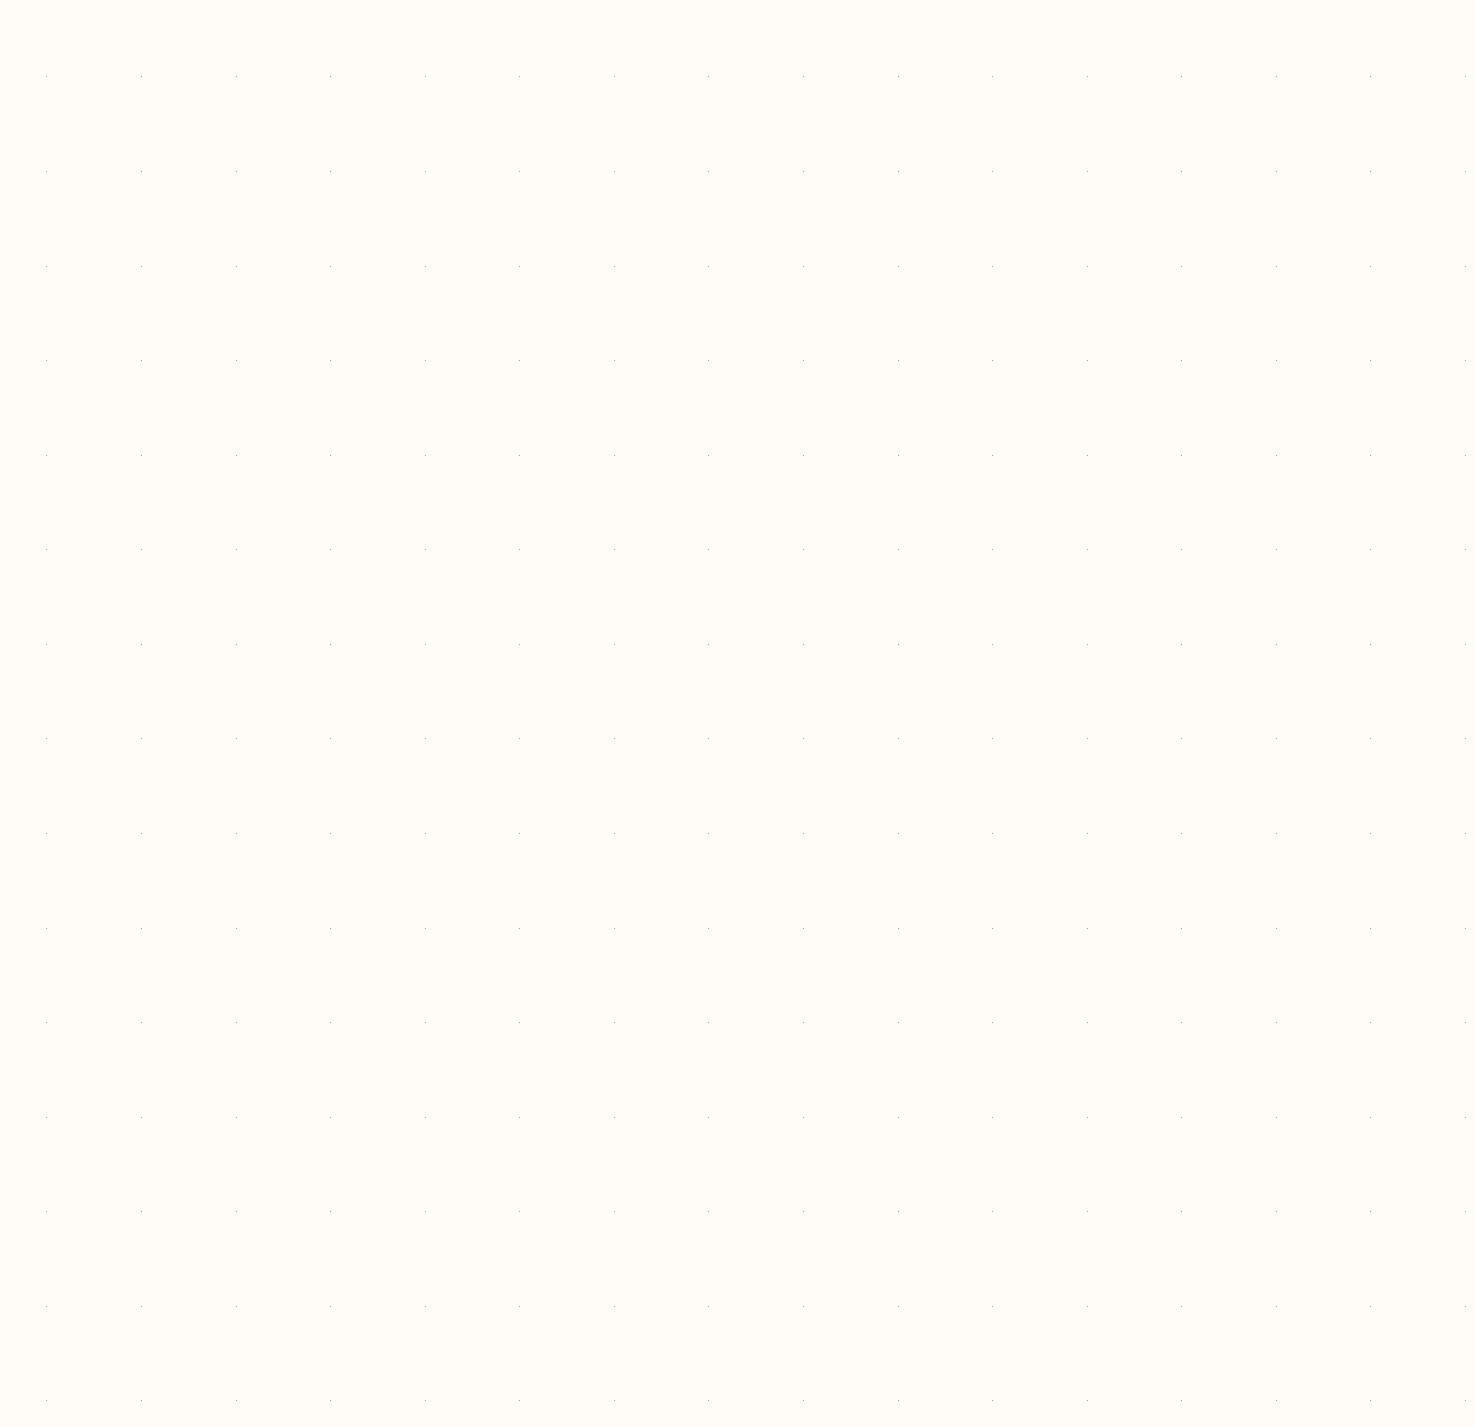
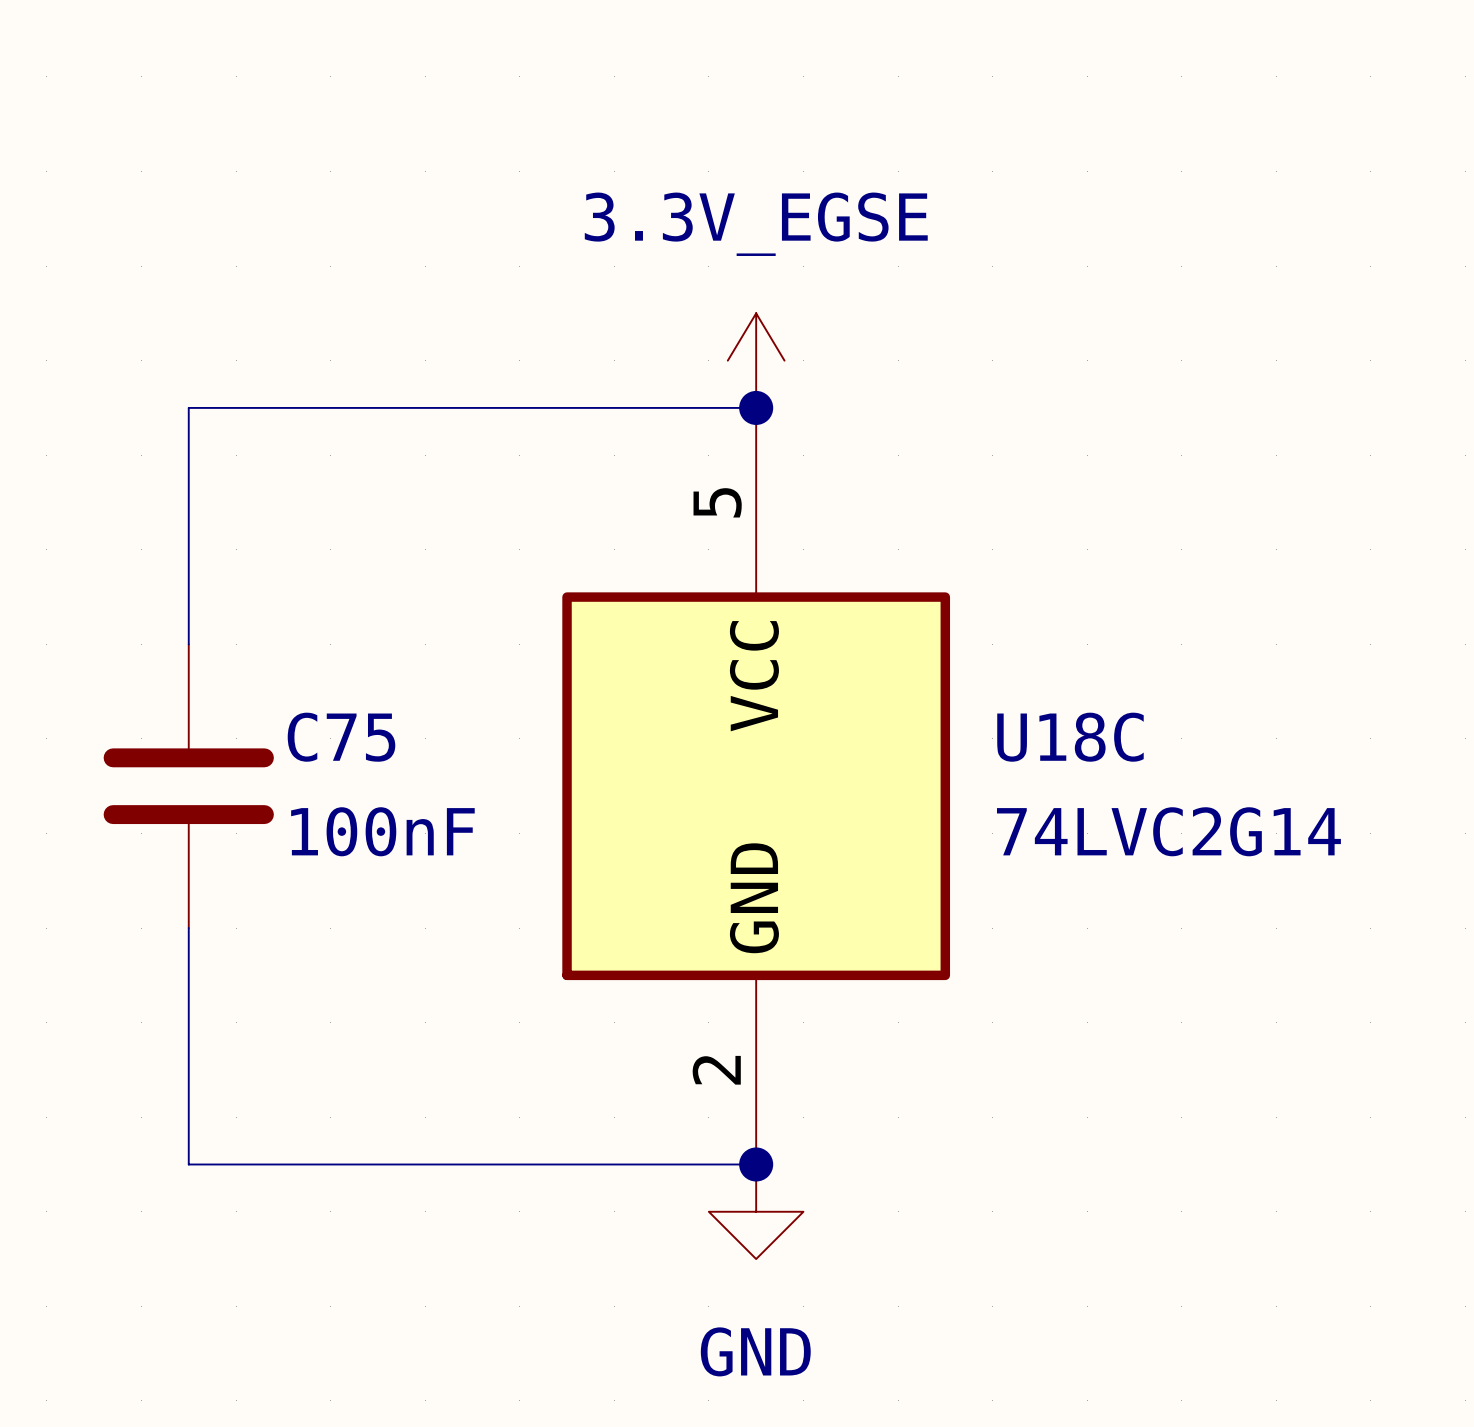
power symbol: none -> 3.3V_EGSE (756, 360)
wire: none -> (756, 407) (188, 407) (188, 644)
junction: none -> (756, 407)
C75: none -> 100nF (188, 786)
U18C: none -> 74LVC2G14 (756, 786)
wire: none -> (188, 928) (188, 1164) (756, 1164)
junction: none -> (756, 1164)
power symbol: none -> GND (756, 1211)

